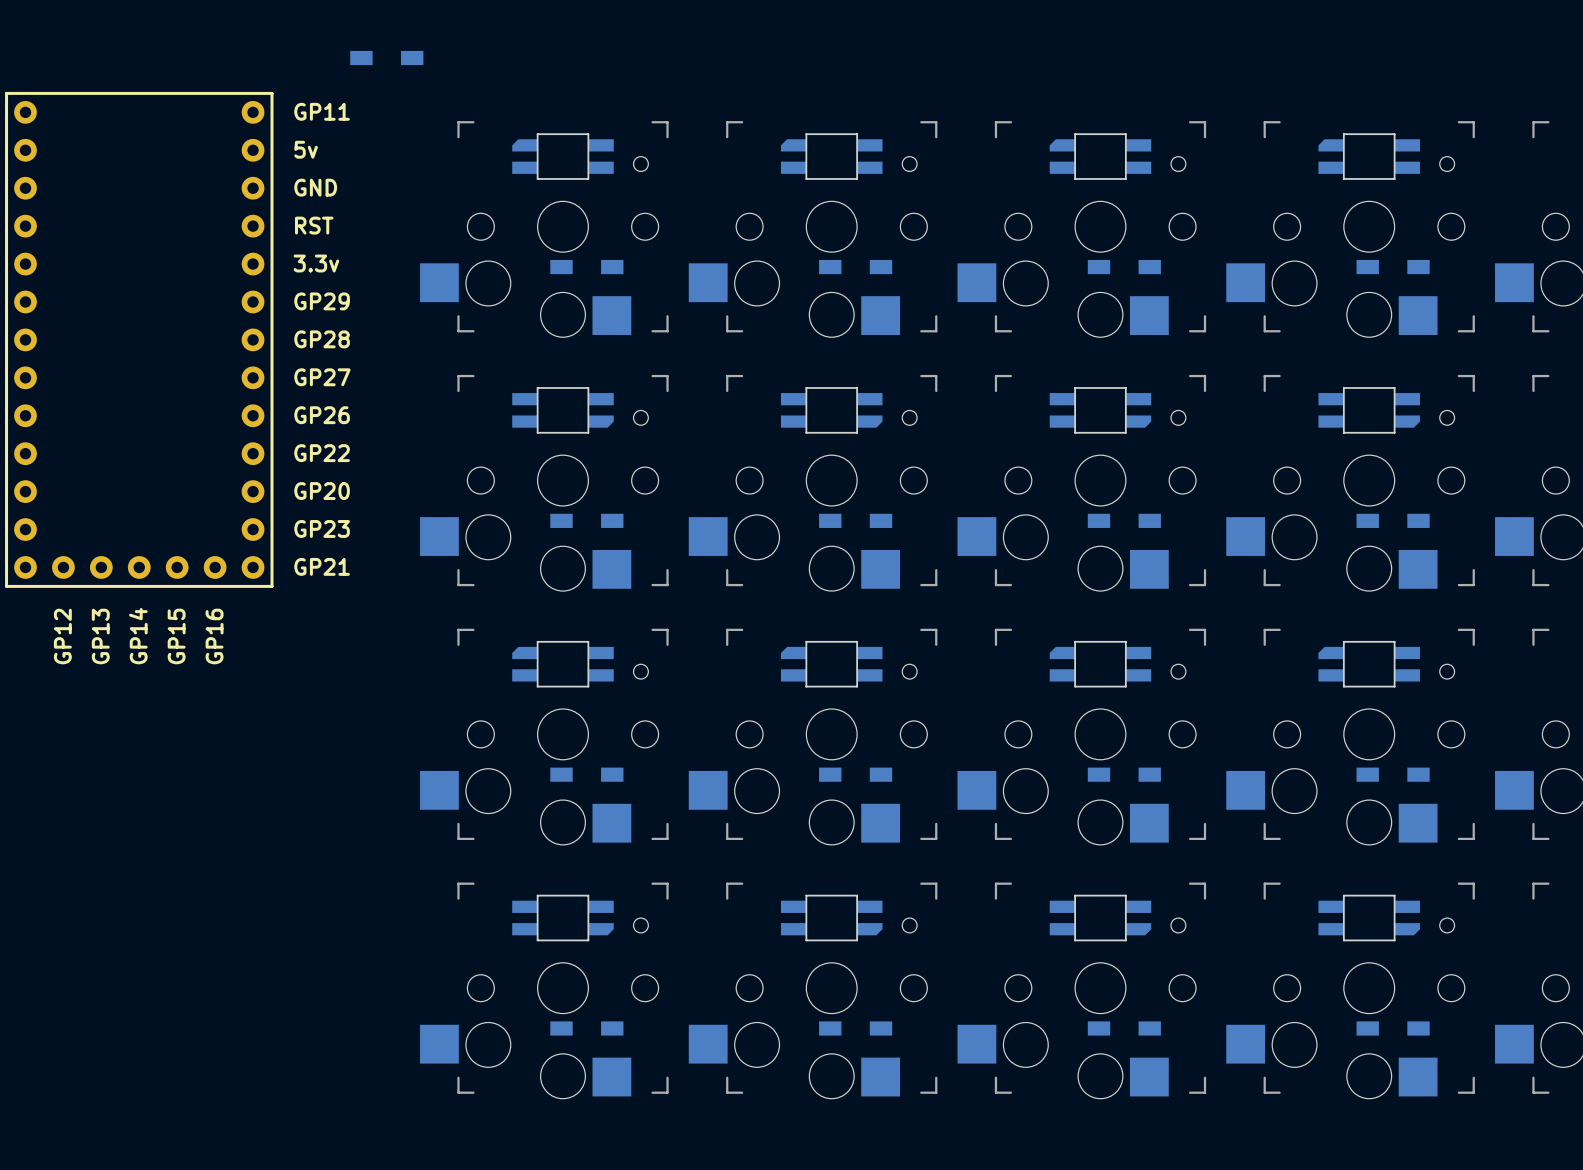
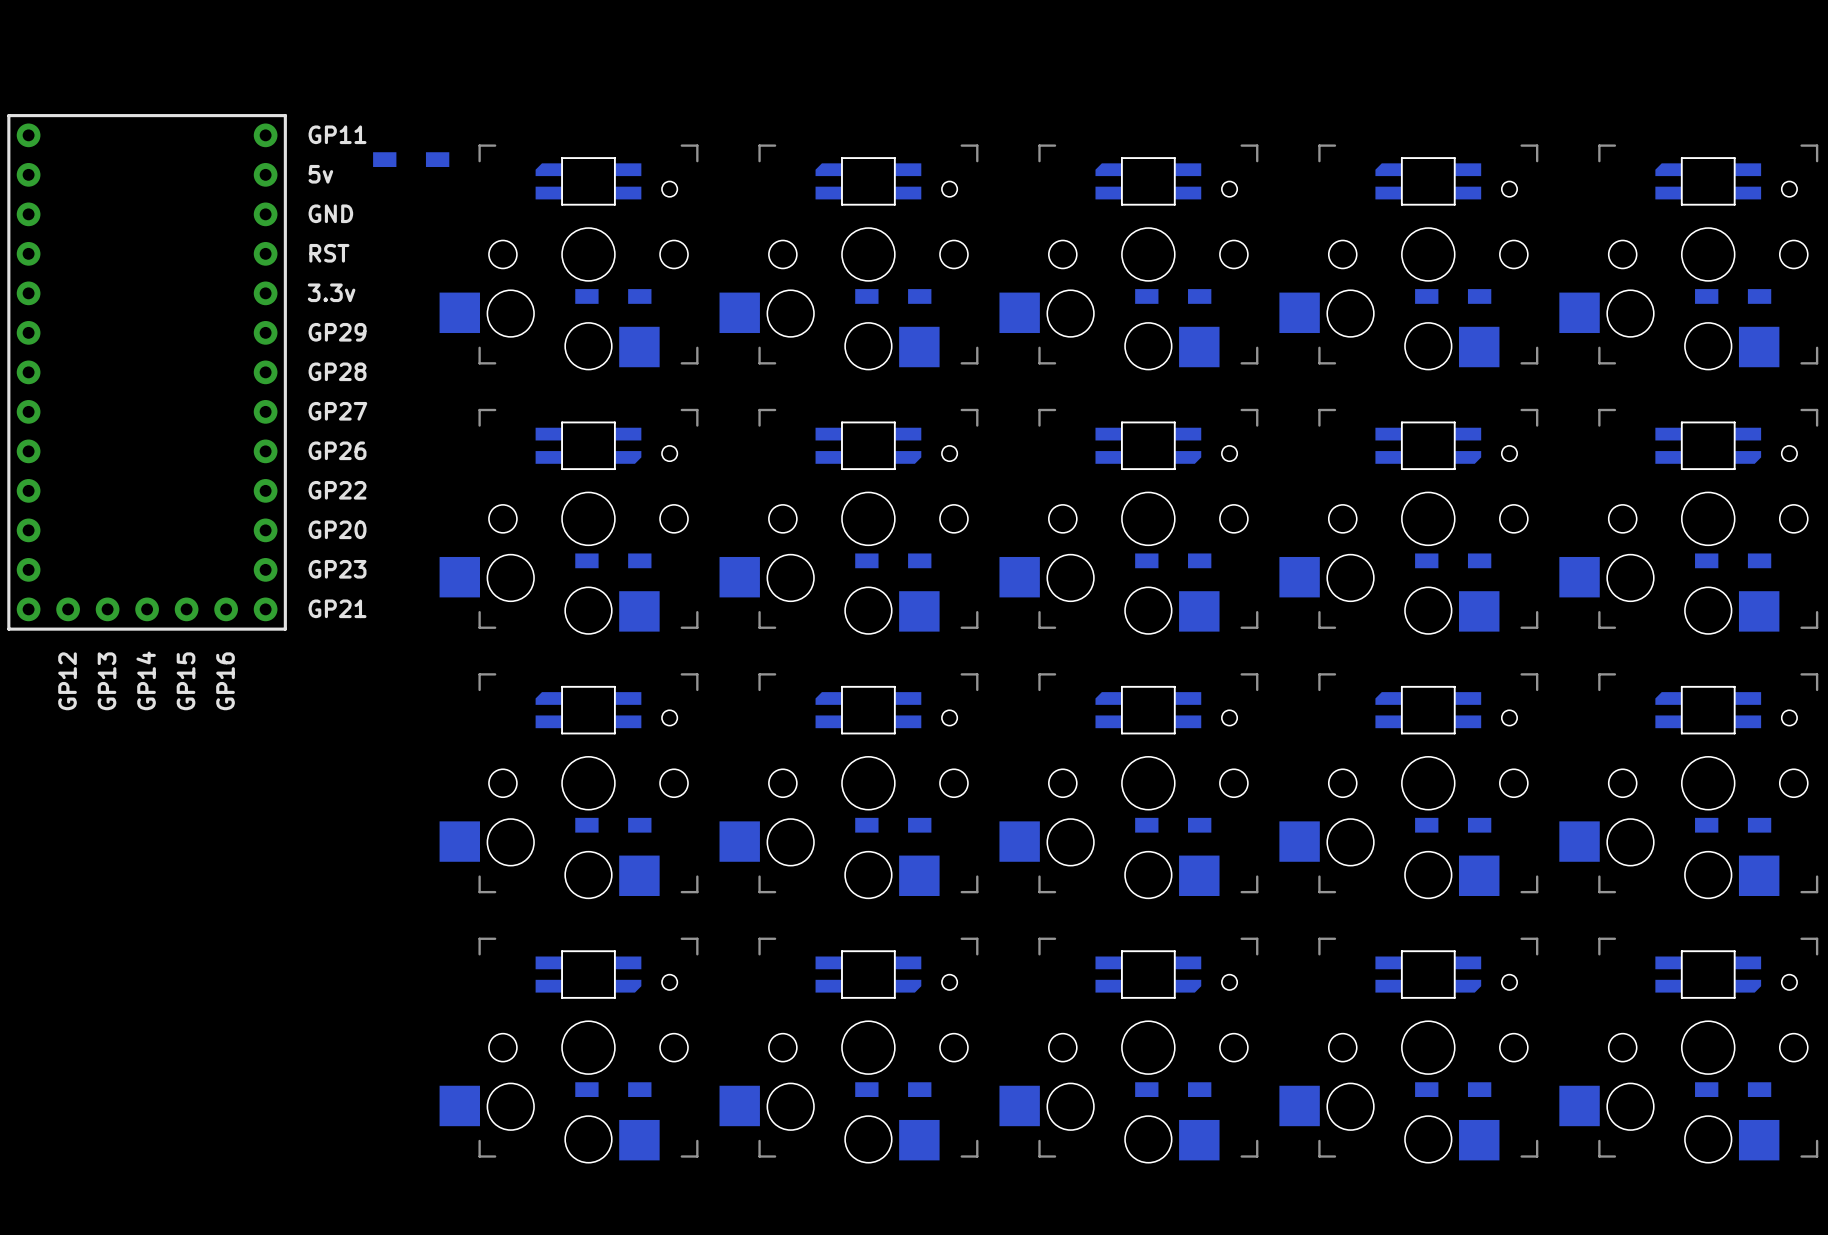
part position: (386, 58) -> (411, 159)

